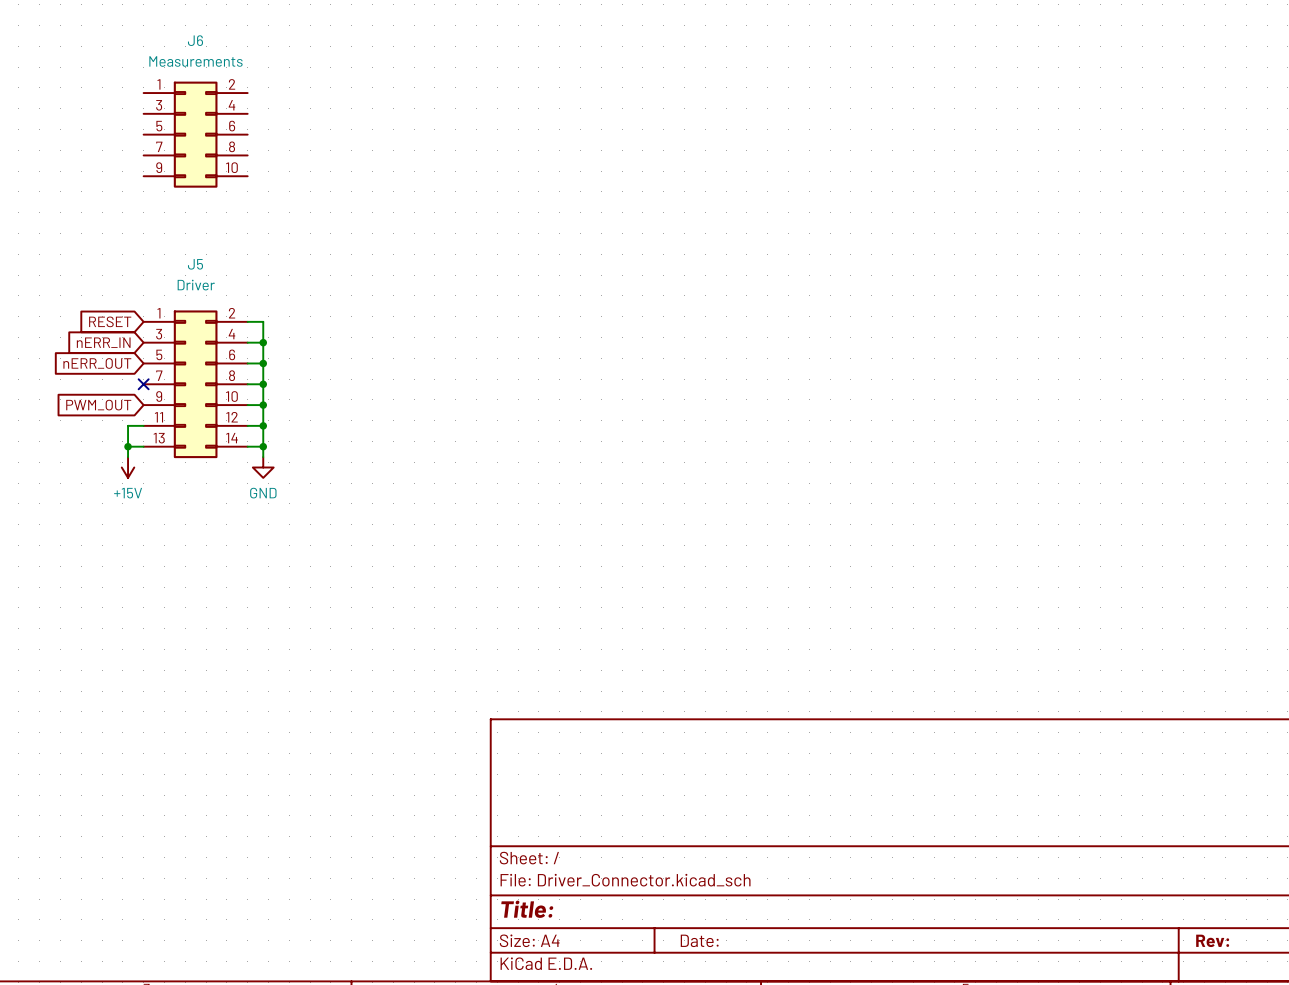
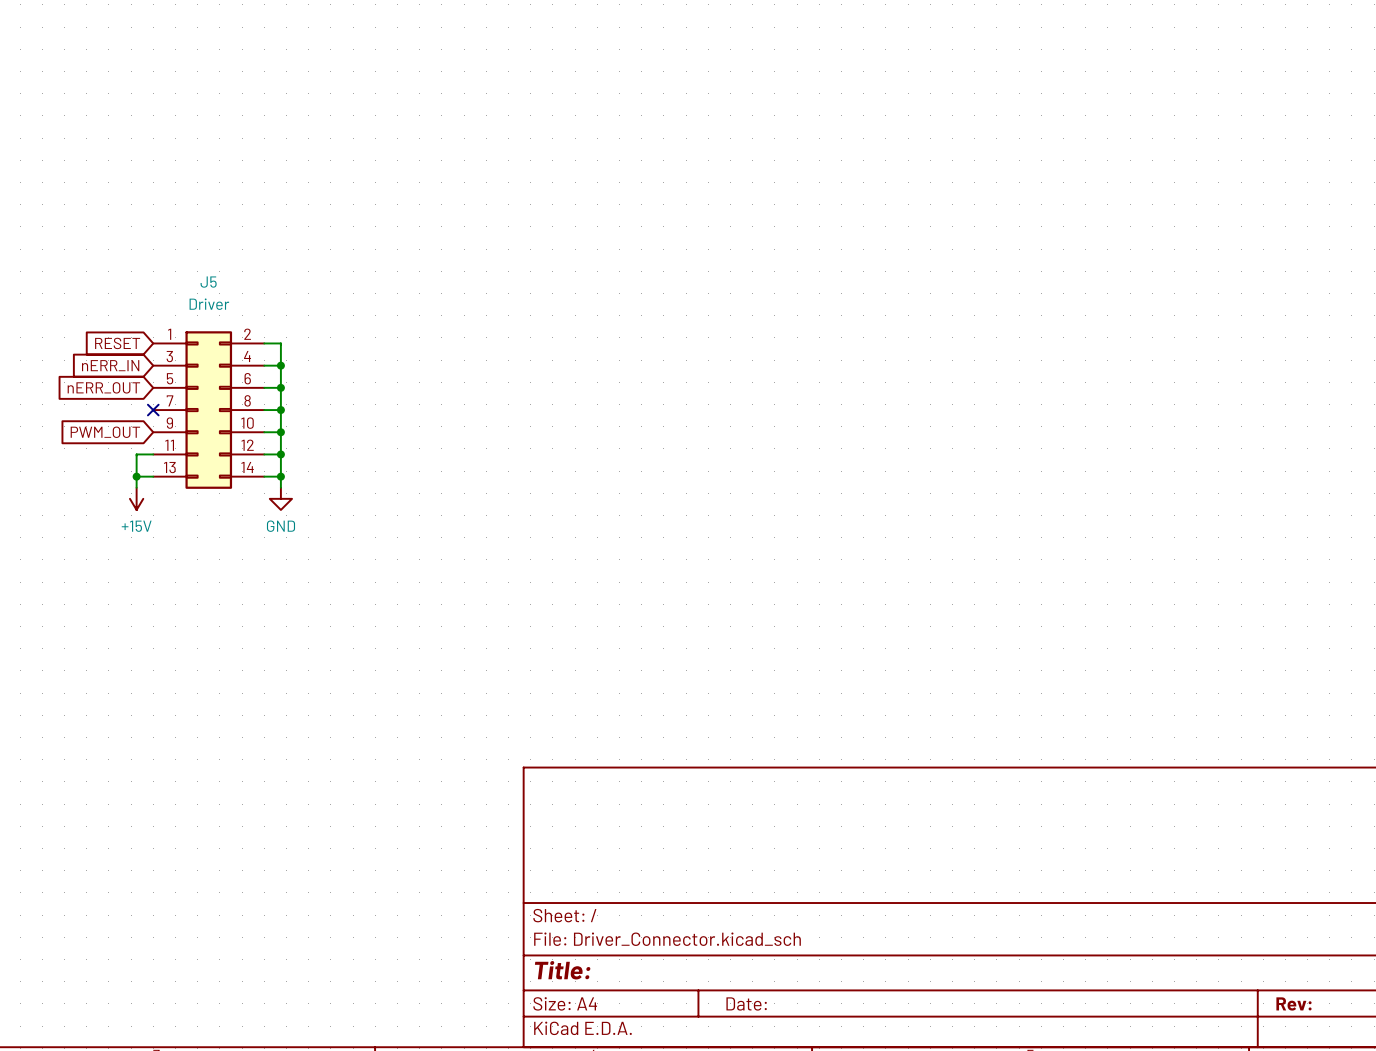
J6: Measurements (195, 134) -> none

